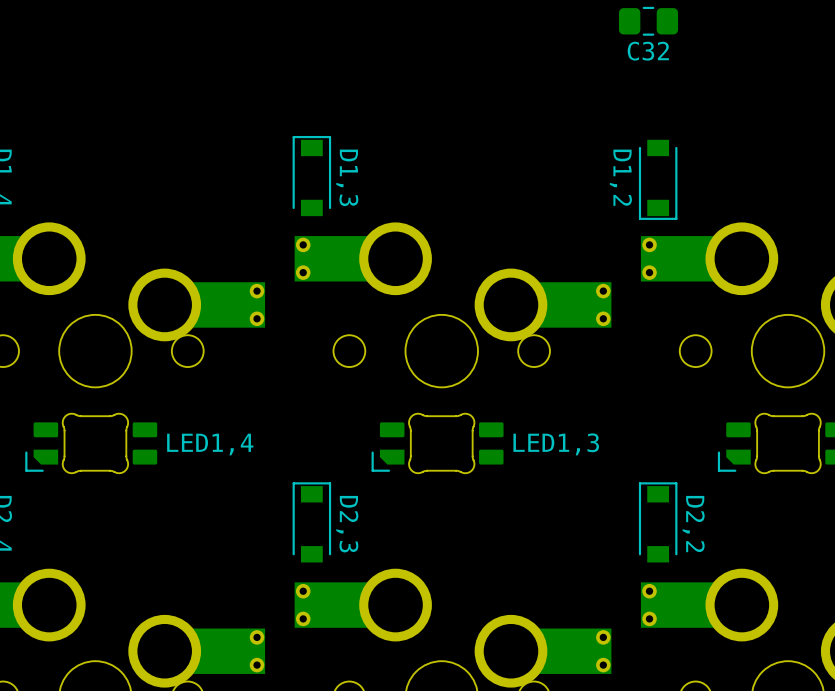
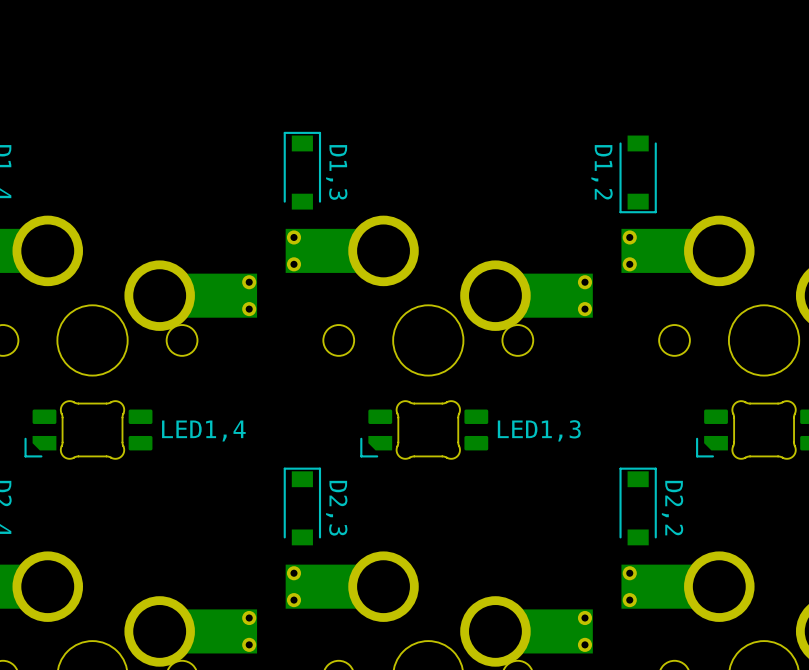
C32: (648, 21) -> none

